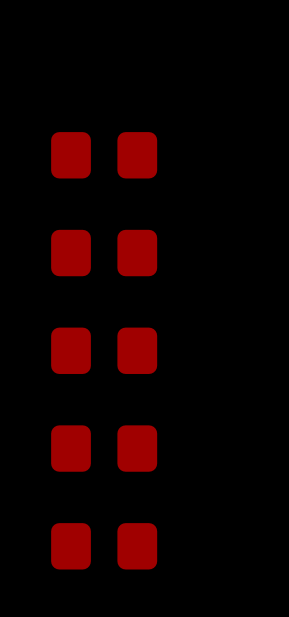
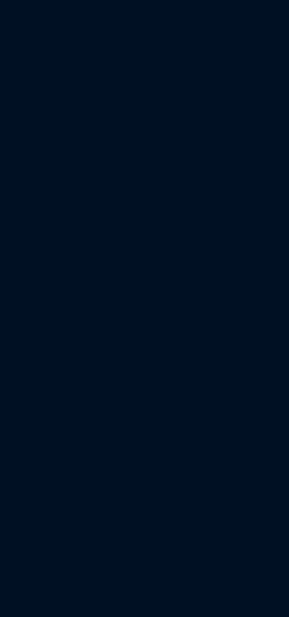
part: (104, 155) -> none
part: (104, 253) -> none
part: (104, 350) -> none
part: (104, 448) -> none
part: (104, 546) -> none

